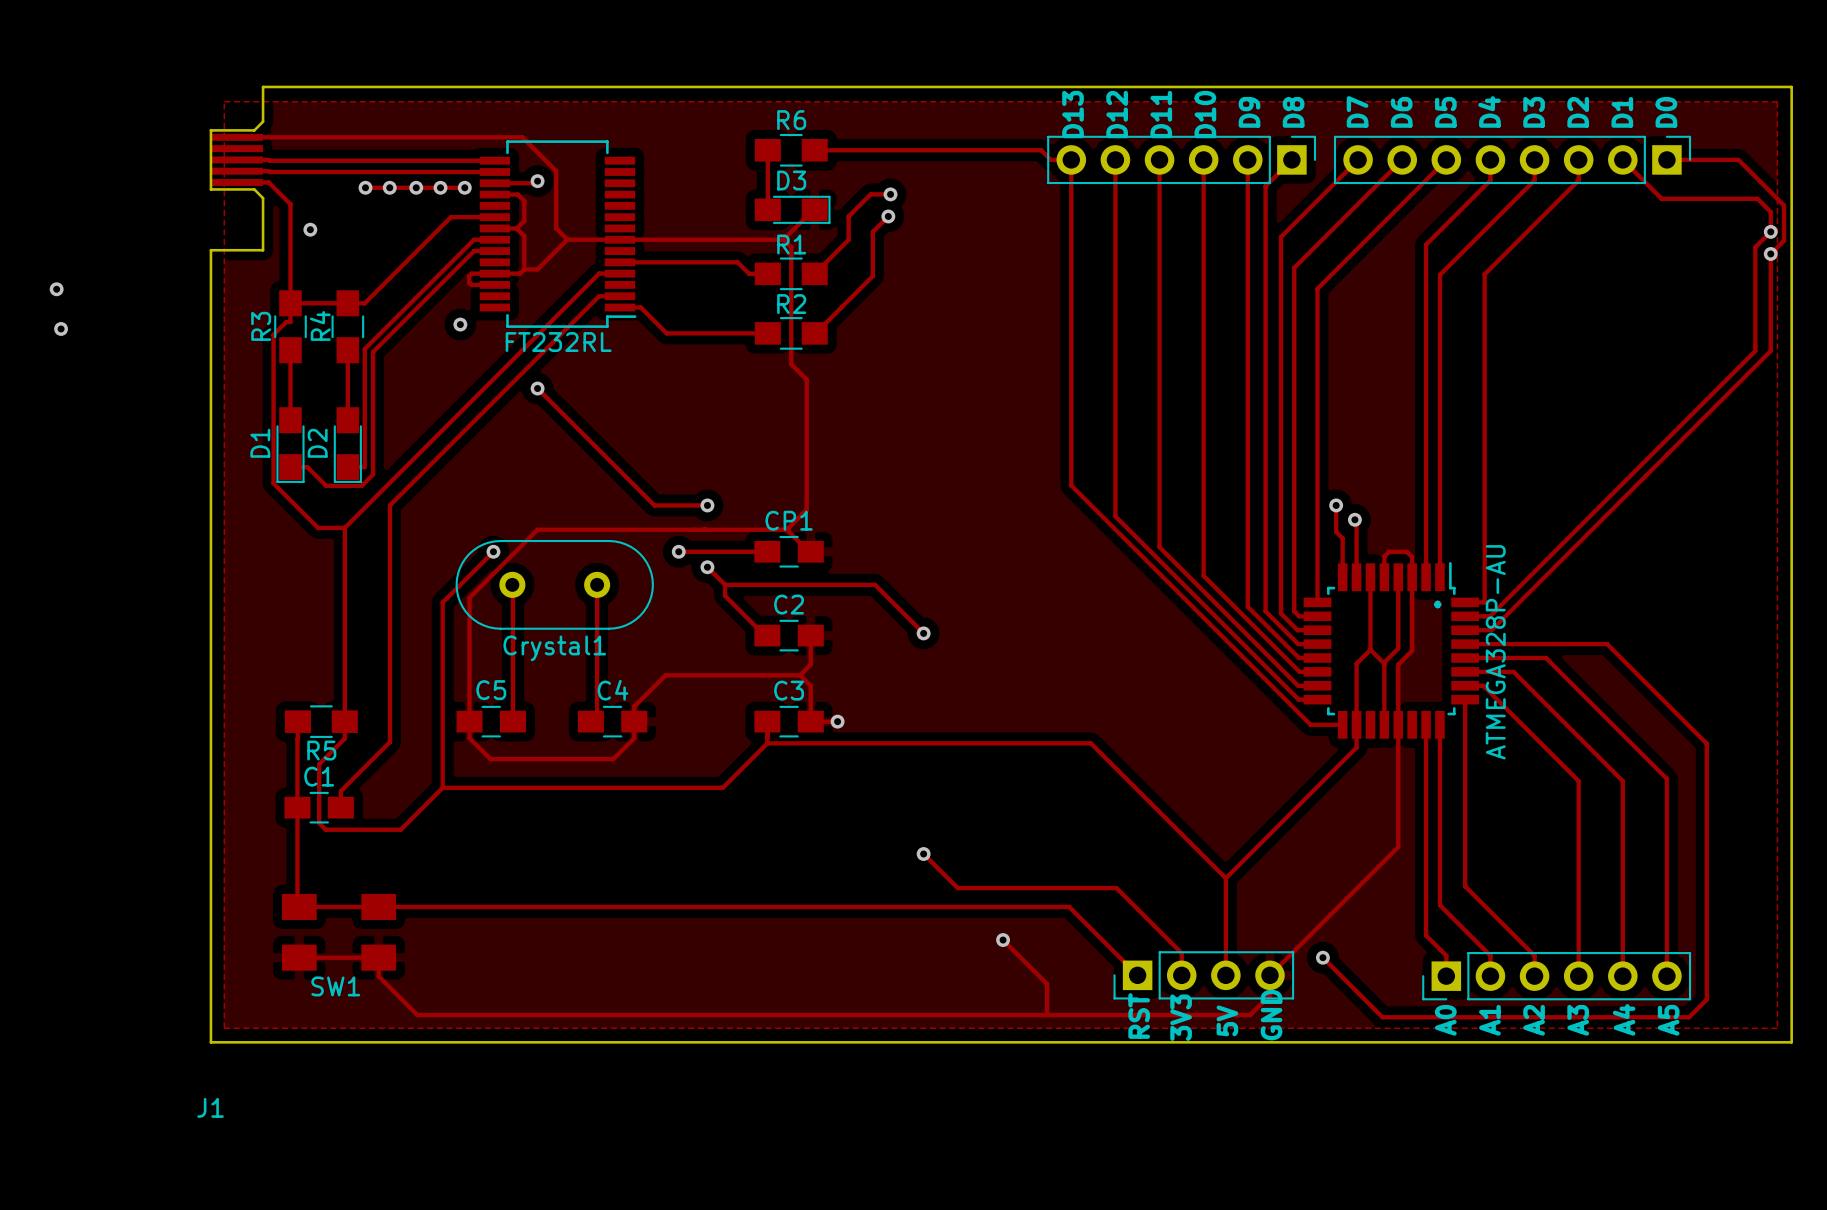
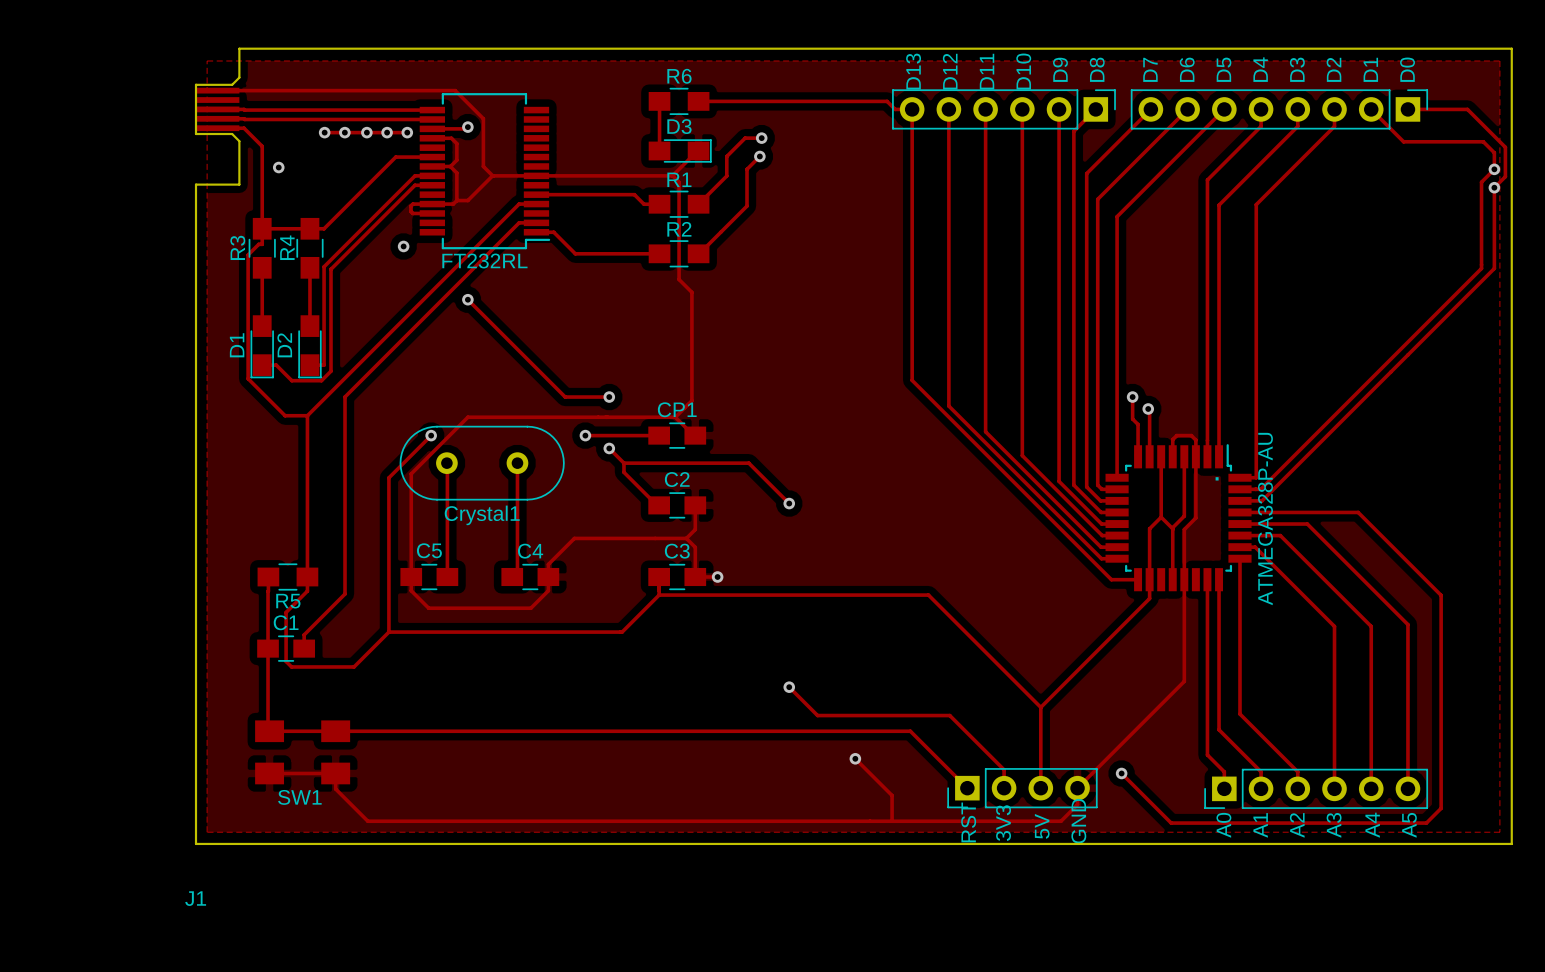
via: (56, 289) -> none
via: (61, 328) -> none

